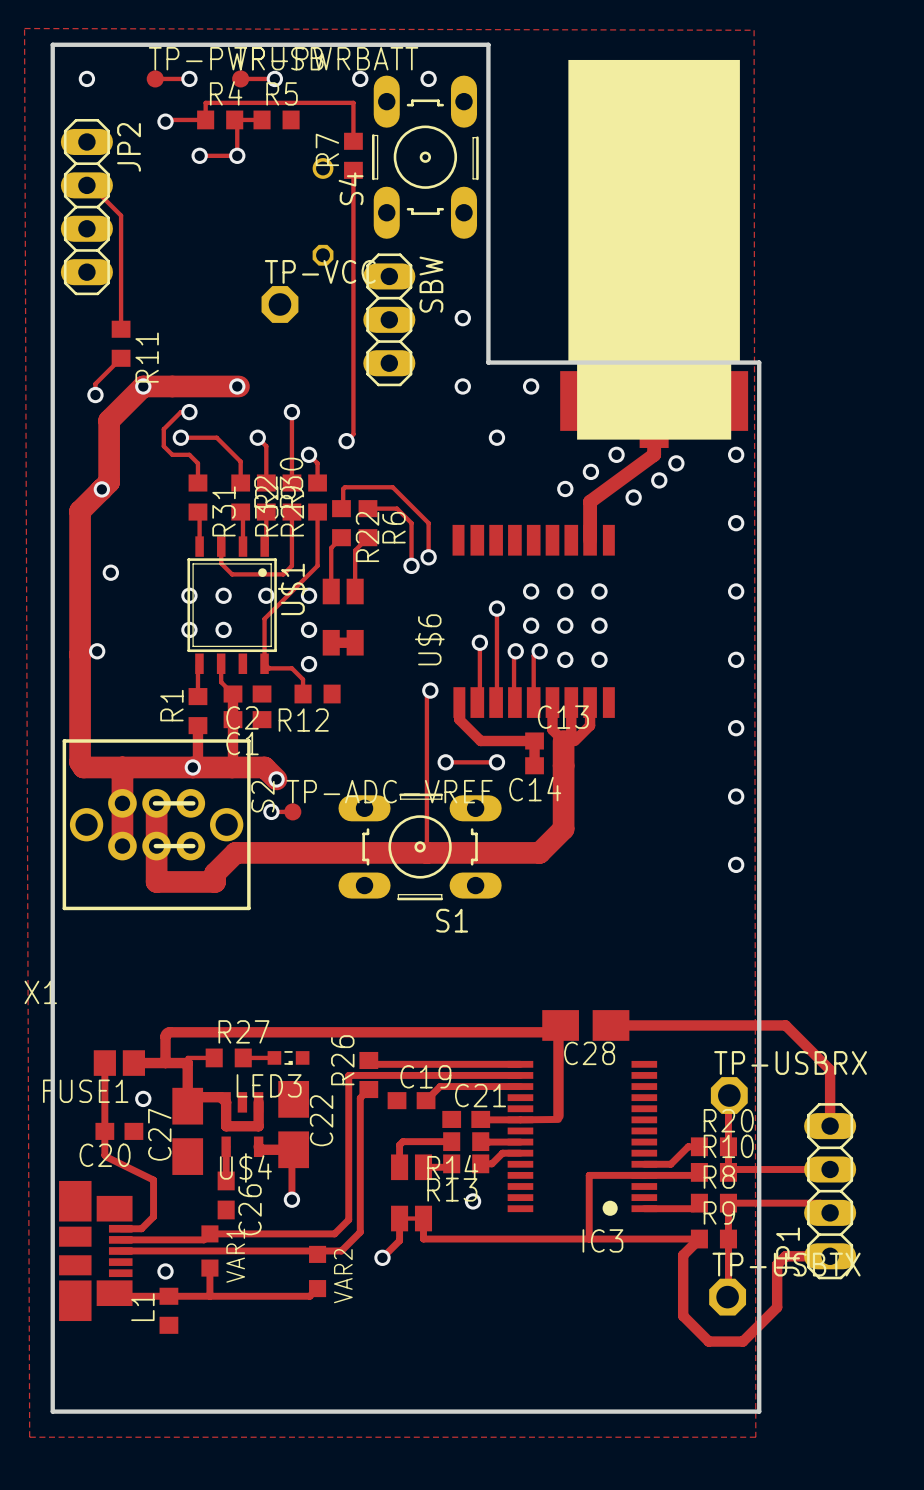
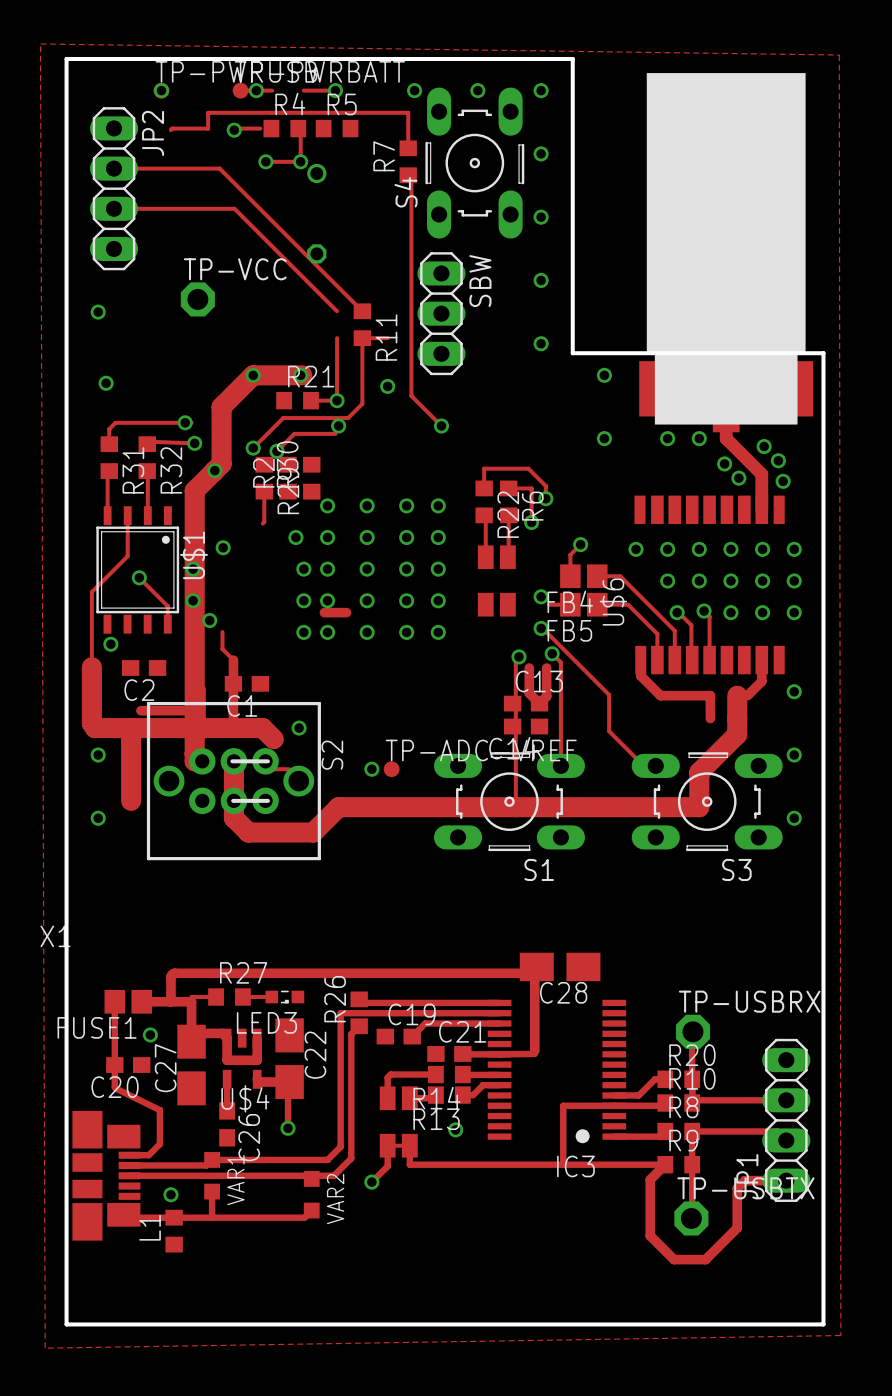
zone outline: (24, 28) (754, 30) (755, 1437) (29, 1437) -> (40, 43) (839, 55) (840, 1335) (45, 1348)
board edge: (488, 44) (488, 362) (599, 362) -> (469, 58) (572, 58) (572, 353)
via: (86, 78) -> none
track: (155, 78) (189, 78) -> (303, 90) (335, 90)
via: none -> (161, 90)
via: (189, 78) -> none
via position: (274, 78) -> (256, 90)
via position: (360, 78) -> (335, 90)
via: none -> (477, 90)
via: none -> (541, 90)
track: (353, 102) (353, 141) -> (344, 112) (408, 112) (408, 148)
R4 position: (220, 119) -> (284, 128)
track: (237, 119) (237, 155) (199, 155) -> (300, 128) (300, 161) (265, 161)
R5 position: (276, 119) -> (337, 128)
via: (165, 121) -> none
via: none -> (234, 130)
via: none -> (541, 153)
via: (199, 155) -> none
via: (237, 155) -> none
via: none -> (265, 161)
via: none -> (300, 161)
R7 position: (353, 155) -> (408, 161)
S4 position: (425, 157) -> (474, 163)
track: none -> (114, 168) (219, 168) (362, 311)
track: (356, 170) (353, 170) (353, 434) (346, 441) -> none
track: none -> (408, 175) (411, 175) (411, 395) (441, 425)
track: (86, 185) (90, 185) (121, 215) (121, 329) -> none
track: none -> (114, 208) (234, 208) (337, 311)
JP2 position: (86, 207) -> (114, 188)
via: none -> (541, 217)
part position: (654, 253) -> (726, 252)
via: none -> (541, 280)
TP-VCC position: (279, 304) -> (197, 299)
via: none -> (98, 312)
via: (462, 318) -> none
SBW position: (389, 319) -> (441, 313)
R11 position: (121, 343) -> (362, 324)
track: none -> (337, 338) (337, 400) (310, 400)
track: none -> (387, 338) (362, 338) (362, 403) (348, 418) (283, 418) (253, 448)
via: none -> (541, 343)
track: (121, 358) (95, 383) (95, 395) -> none
board edge: (759, 362) (759, 1411) -> (720, 353) (823, 353) (823, 1324) (720, 1324)
via: (143, 386) -> none
via position: (237, 386) -> (253, 375)
track: (238, 386) (143, 386) (109, 420) (109, 482) (80, 511) (80, 620) -> (127, 515) (127, 556) (91, 592)
via: none -> (300, 375)
track: none -> (302, 375) (253, 375) (221, 406) (221, 463) (194, 490) (194, 761) (202, 761) (194, 753)
via: (462, 386) -> none
via: (531, 386) -> none
via: none -> (604, 375)
via: none -> (387, 386)
track: (189, 412) (180, 412) (163, 429) (163, 446) (172, 454) (189, 454) (197, 463) (197, 483) -> none
via: (189, 412) -> none
track: (291, 412) (291, 483) -> none
via: (291, 412) -> none
R21: none -> (297, 400)
via: none -> (337, 400)
track: (654, 418) (654, 454) (590, 501) (590, 540) -> none
track: none -> (726, 404) (726, 438) (761, 474) (761, 509)
track: none -> (185, 422) (115, 422) (109, 429) (109, 444)
track: (187, 437) (216, 437) (240, 461) (240, 483) -> none
track: (257, 437) (266, 446) (266, 483) -> none
via: (257, 437) -> none
via: (496, 437) -> none
via: none -> (441, 425)
track: none -> (335, 433) (294, 433) (276, 451)
track: (309, 454) (317, 463) (317, 483) -> none
via: (309, 454) -> none
via position: (616, 454) -> (604, 438)
via: none -> (667, 438)
track: none -> (194, 443) (149, 441) (147, 444)
via: none -> (194, 443)
via: (676, 463) -> none
via: none -> (764, 446)
via: none -> (253, 448)
via: none -> (276, 451)
via: (590, 471) -> none
via: none -> (778, 460)
via: (659, 480) -> none
via: none -> (724, 463)
via: (565, 488) -> none
track: none -> (109, 471) (107, 474) (107, 515)
via: (101, 489) -> none
track: none -> (147, 471) (147, 515)
via: none -> (214, 470)
R31 position: (197, 497) -> (109, 457)
R32 position: (240, 497) -> (147, 457)
via: (633, 497) -> none
via: none -> (738, 478)
via: none -> (783, 481)
track: (341, 508) (344, 487) (392, 487) (428, 523) (428, 557) -> none
track: (367, 508) (397, 508) (411, 523) (411, 565) -> none
track: none -> (484, 488) (484, 468) (528, 468) (545, 486) (545, 498)
track: none -> (508, 488) (531, 488) (531, 522)
track: (197, 512) (199, 512) (199, 546) -> none
track: (240, 512) (242, 512) (242, 546) -> none
track: (291, 512) (291, 565) (283, 574) (232, 574) (221, 563) (221, 546) -> none
track: (317, 512) (317, 565) (264, 618) (264, 663) (269, 668) (291, 668) (303, 679) (303, 694) -> none
via: none -> (545, 498)
R22 position: (341, 523) -> (484, 501)
R6 position: (367, 523) -> (508, 501)
via: (736, 523) -> none
via: none -> (327, 505)
via: none -> (367, 505)
via: none -> (406, 505)
via: none -> (438, 505)
track: (341, 537) (331, 547) (331, 591) -> none
track: (367, 537) (355, 550) (355, 591) -> none
track: none -> (484, 515) (485, 515) (485, 557)
track: none -> (508, 515) (507, 557)
via: none -> (531, 522)
via: (428, 557) -> none
via: none -> (295, 537)
via: none -> (327, 537)
via: none -> (367, 537)
via: none -> (406, 537)
via: none -> (438, 537)
via: (411, 565) -> none
track: none -> (580, 544) (570, 554) (570, 576)
via: (110, 572) -> none
via: none -> (636, 549)
via: none -> (667, 549)
via: none -> (699, 549)
via: none -> (730, 549)
via: none -> (762, 549)
via: none -> (794, 549)
via: (531, 591) -> none
via: (565, 591) -> none
via position: (599, 591) -> (580, 544)
via: (736, 591) -> none
via position: (223, 595) -> (223, 547)
via: (266, 595) -> none
via: none -> (327, 569)
via: none -> (367, 569)
via: none -> (406, 569)
via: none -> (438, 569)
FB4: none -> (583, 576)
track: none -> (597, 576) (620, 576) (674, 630) (674, 660)
track: none -> (139, 577) (167, 606) (167, 624)
via: none -> (139, 577)
U$1 position: (232, 605) -> (137, 569)
track: (496, 608) (496, 702) -> none
via: (496, 608) -> none
via: none -> (667, 580)
via: none -> (699, 580)
via: none -> (730, 580)
via: none -> (762, 580)
via: none -> (794, 580)
part position: (343, 617) -> (496, 580)
track width: thick (80, 620) (80, 701) -> thin (91, 592) (91, 667)
U$6 position: (533, 621) -> (709, 584)
via: (531, 625) -> none
via: (599, 625) -> none
via position: (223, 629) -> (209, 620)
via: none -> (327, 600)
via: none -> (367, 600)
via: none -> (406, 600)
via: none -> (438, 600)
track: none -> (549, 604) (570, 604)
FB5: none -> (583, 604)
track: none -> (597, 604) (628, 604) (657, 633) (657, 660)
track: none -> (704, 611) (709, 616) (709, 660)
via: none -> (704, 611)
track: (479, 642) (479, 699) (477, 702) -> none
via: (479, 642) -> none
track: none -> (677, 612) (691, 625) (692, 660)
via: none -> (677, 612)
via: none -> (730, 612)
via: none -> (762, 612)
via: none -> (794, 612)
via position: (97, 651) -> (110, 644)
track: (515, 651) (514, 653) (514, 702) -> none
via: (515, 651) -> none
track: (539, 651) (533, 655) (533, 702) -> none
via: (539, 651) -> none
via: (599, 659) -> none
via: (736, 659) -> none
track: none -> (545, 631) (609, 694) (609, 731) (643, 765) (655, 765)
via: none -> (327, 632)
via: none -> (367, 632)
via: none -> (406, 632)
via: none -> (438, 632)
track: none -> (552, 653) (560, 662) (560, 765)
via: none -> (552, 653)
track: (430, 690) (426, 694) (426, 852) -> (518, 656) (515, 660) (515, 807)
via: (430, 690) -> none
via: none -> (518, 656)
C2 position: (247, 694) -> (144, 667)
R12: (317, 694) -> none
track: (459, 702) (459, 719) (480, 740) (534, 740) (534, 765) -> (640, 660) (640, 675) (660, 695) (710, 695) (710, 718)
track: (590, 702) (590, 725) (574, 740) (563, 740) (563, 828) (539, 852) -> (761, 660) (761, 681) (747, 695) (737, 695) (737, 734) (699, 772) (699, 807) (517, 807)
R1: (197, 711) -> none
via: (736, 728) -> none
via: none -> (794, 691)
track: none -> (140, 710) (194, 710)
track: (445, 762) (496, 762) -> none
via: (445, 762) -> none
via: (496, 762) -> none
via: (192, 767) -> none
via: none -> (299, 728)
via: (276, 779) -> none
via: none -> (98, 754)
via: (736, 796) -> none
via: none -> (794, 754)
track: (156, 803) (156, 881) (215, 881) (215, 873) (235, 852) (346, 852) -> (233, 761) (233, 817) (248, 832) (313, 832) (338, 807)
via: (271, 811) -> none
TP-ADC-VREF position: (292, 811) -> (391, 769)
via: none -> (371, 769)
S2 position: (156, 824) -> (233, 781)
S1 position: (420, 846) -> (509, 801)
S3: none -> (707, 801)
via: none -> (98, 818)
via: (736, 864) -> none
via: none -> (794, 818)
track: (611, 1025) (785, 1025) (830, 1069) (830, 1126) -> none

